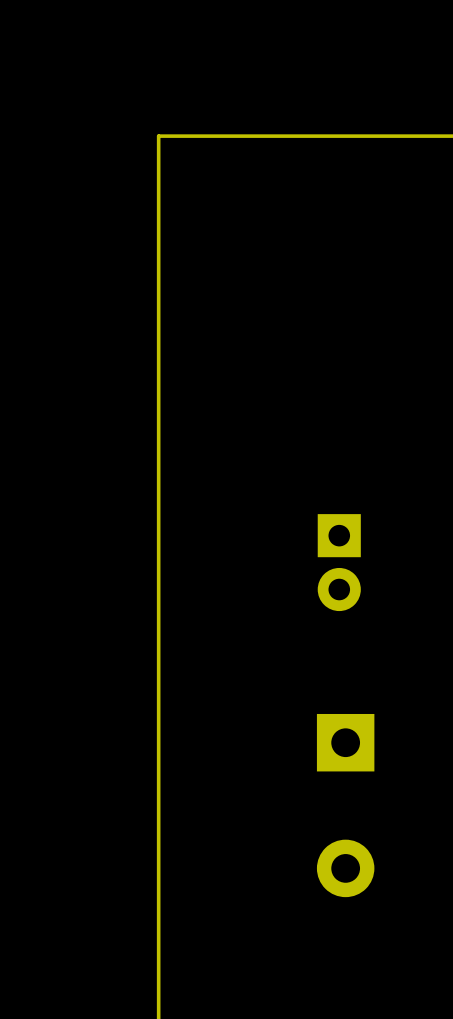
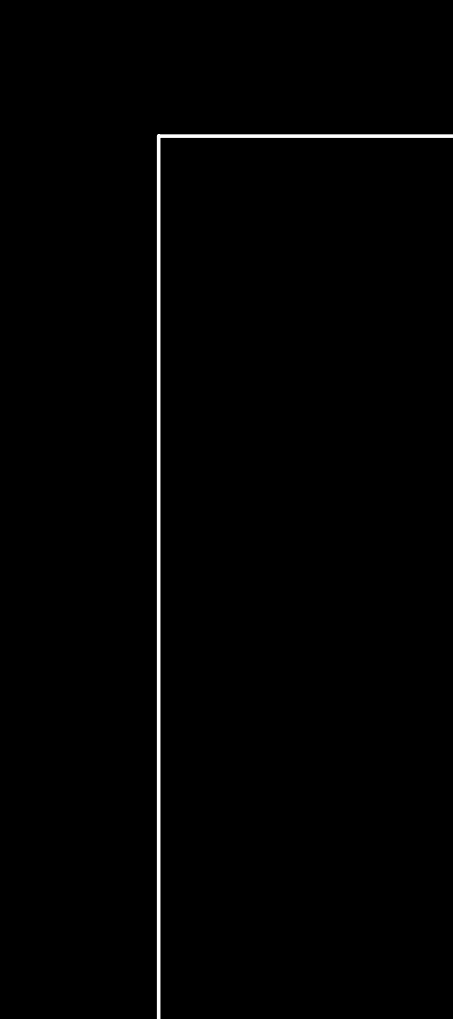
part: (339, 562) -> none
part: (345, 805) -> none

